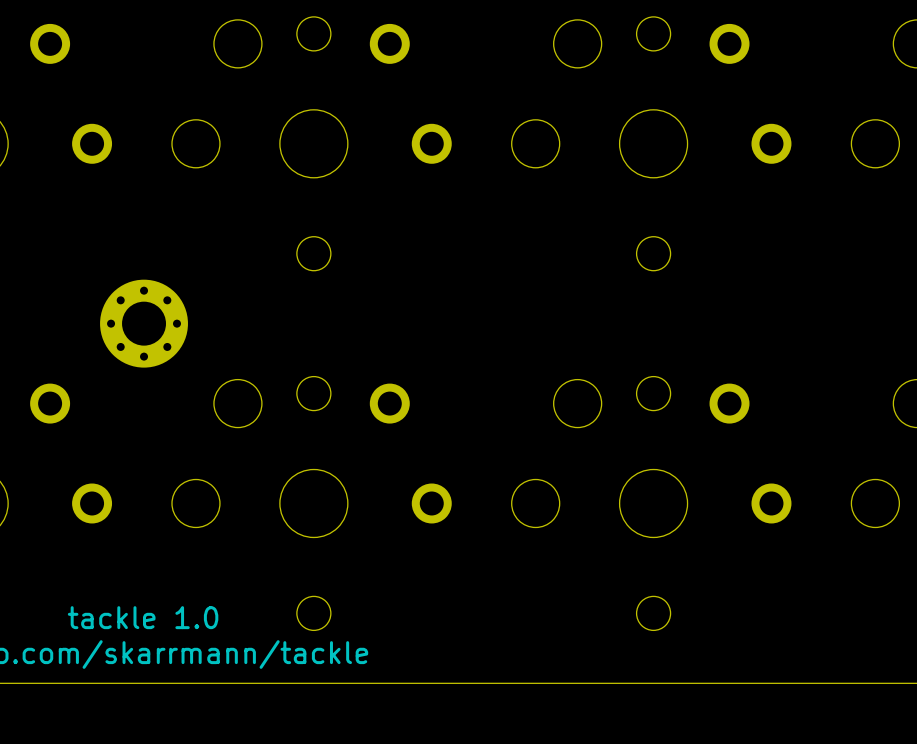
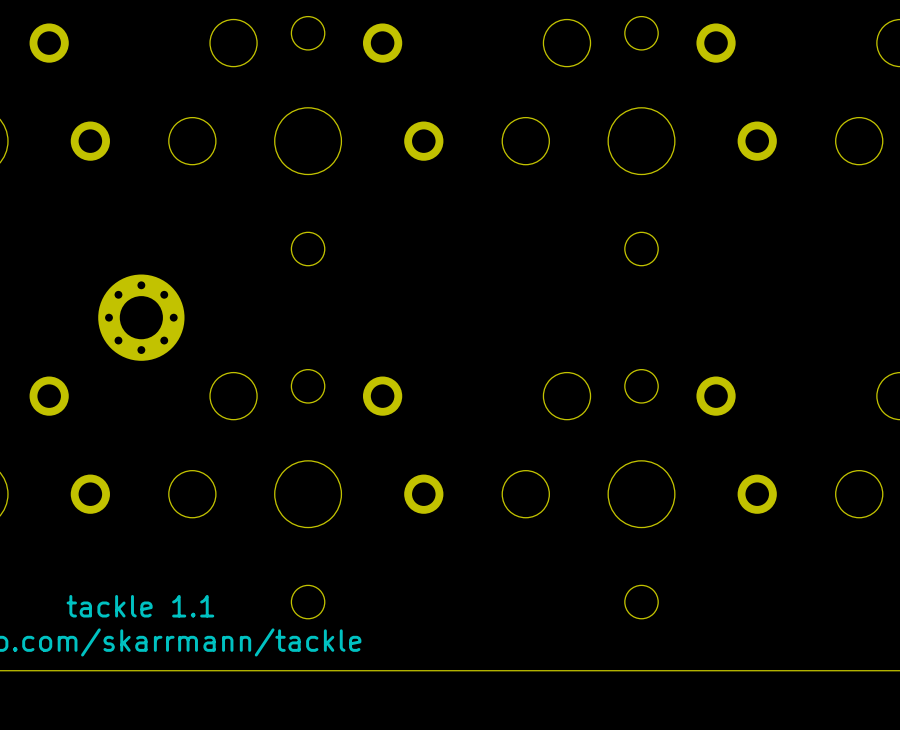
text: tackle 1.0 (143, 617) -> tackle 1.1 (140, 606)

